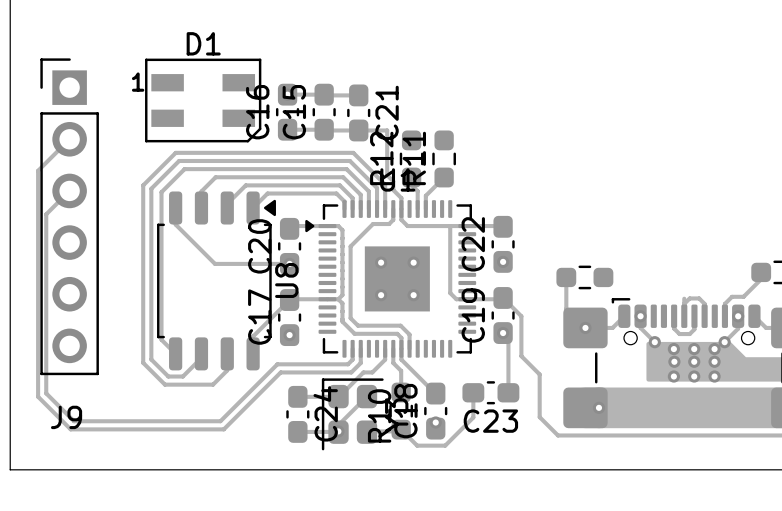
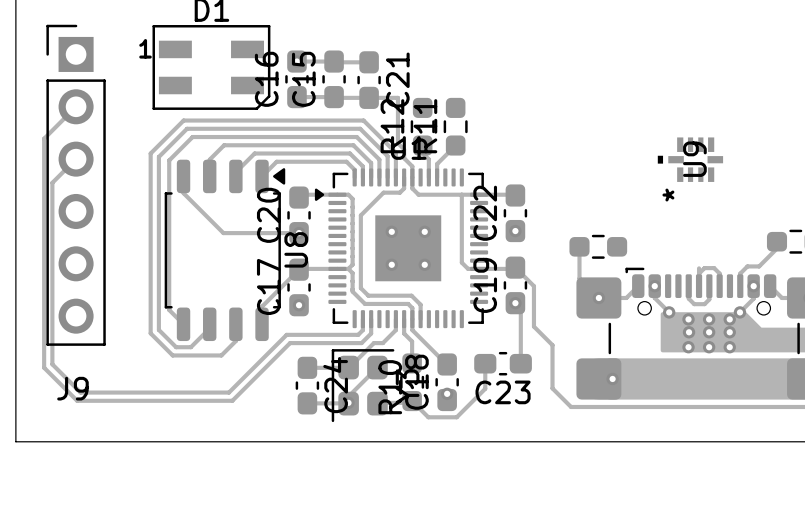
U9: none -> (690, 159)

